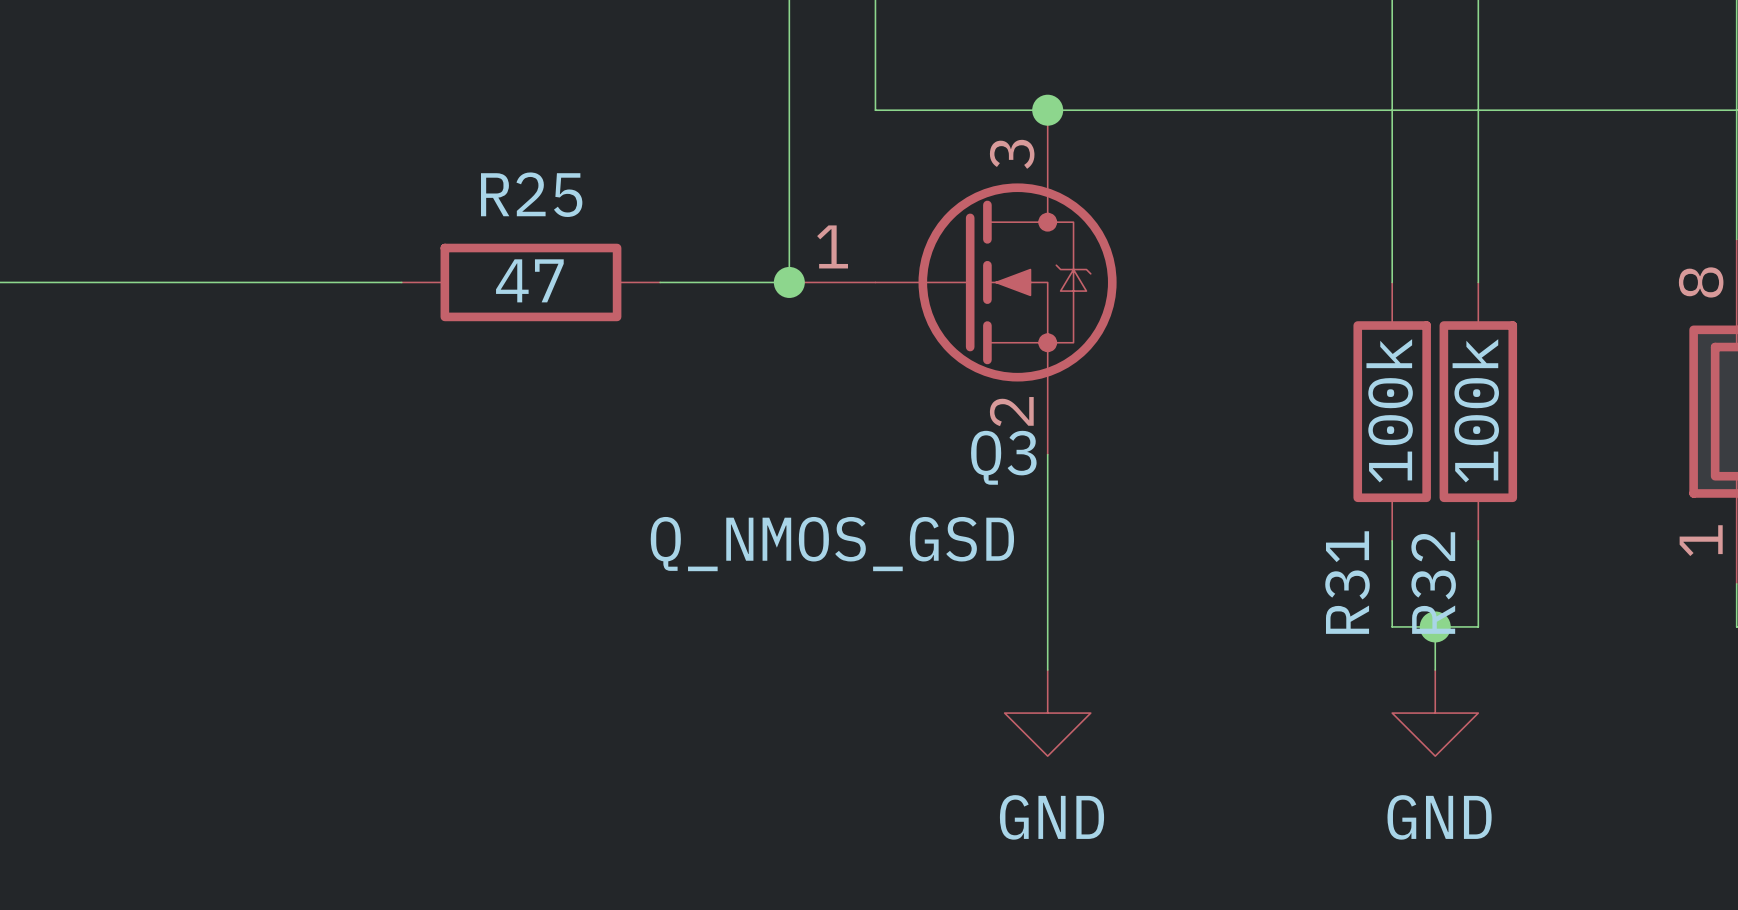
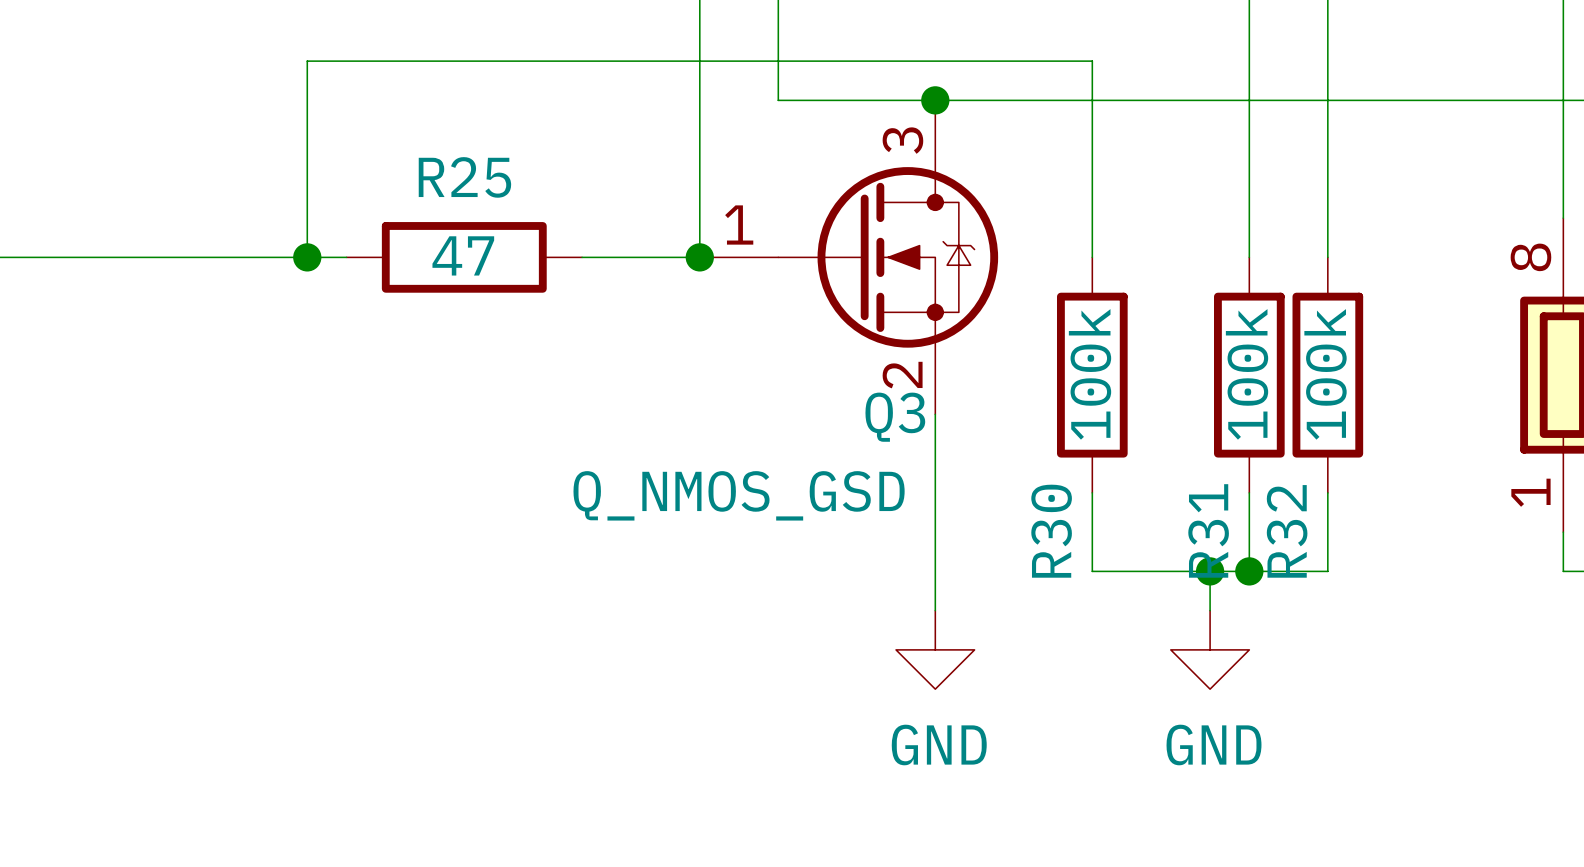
wire: none -> (307, 257) (307, 61) (1092, 61) (1092, 257)
junction: none -> (307, 257)
R30: none -> 100k (1092, 375)
wire: none -> (1092, 492) (1092, 571) (1249, 571)
junction: none -> (1210, 571)
junction: none -> (1249, 571)
wire: (1435, 626) (1435, 670) -> (1210, 571) (1210, 610)
junction: (1435, 626) -> none
power symbol position: GND (1435, 713) -> GND (1210, 649)

